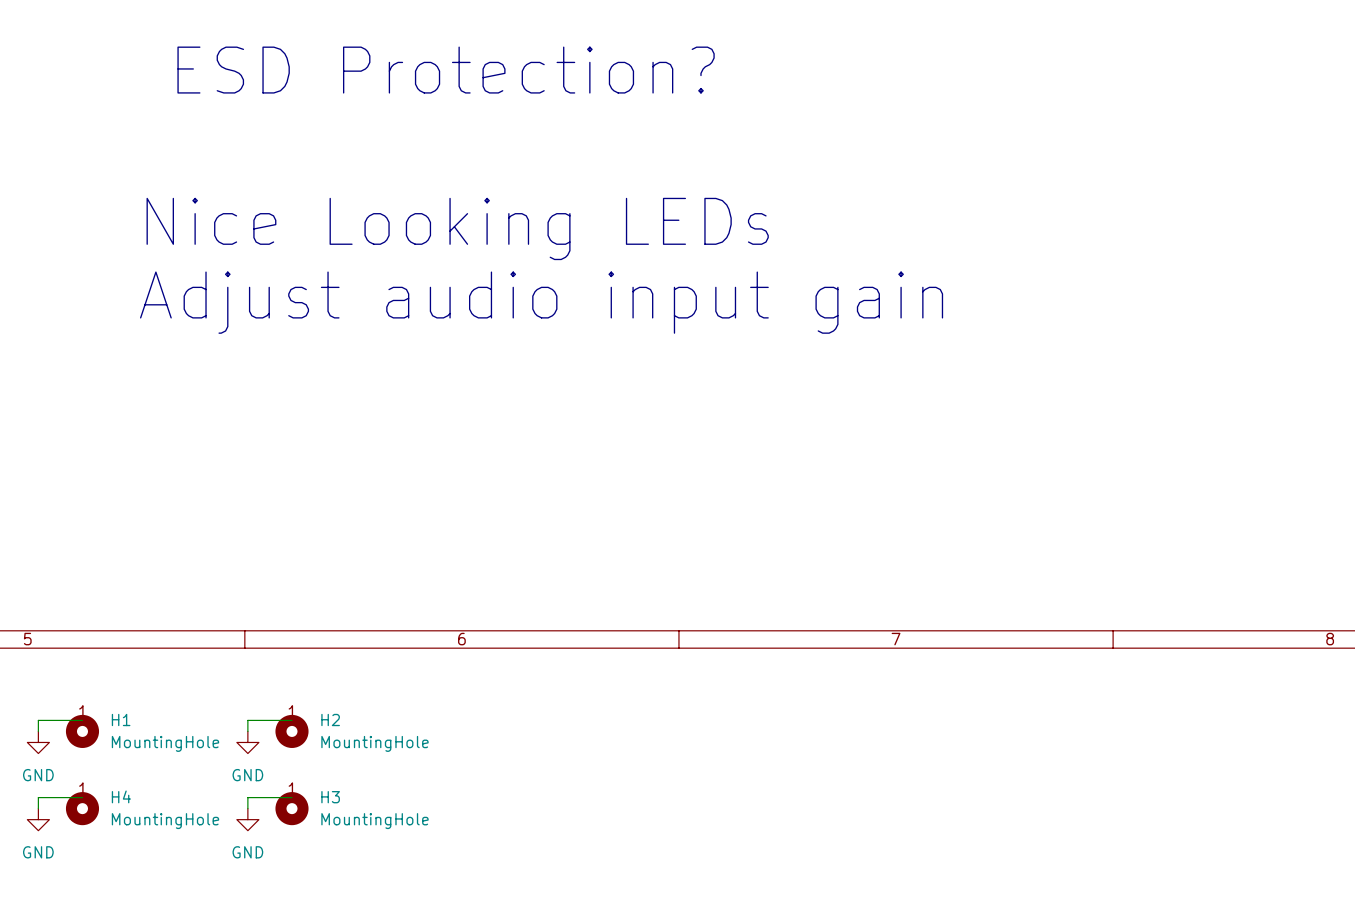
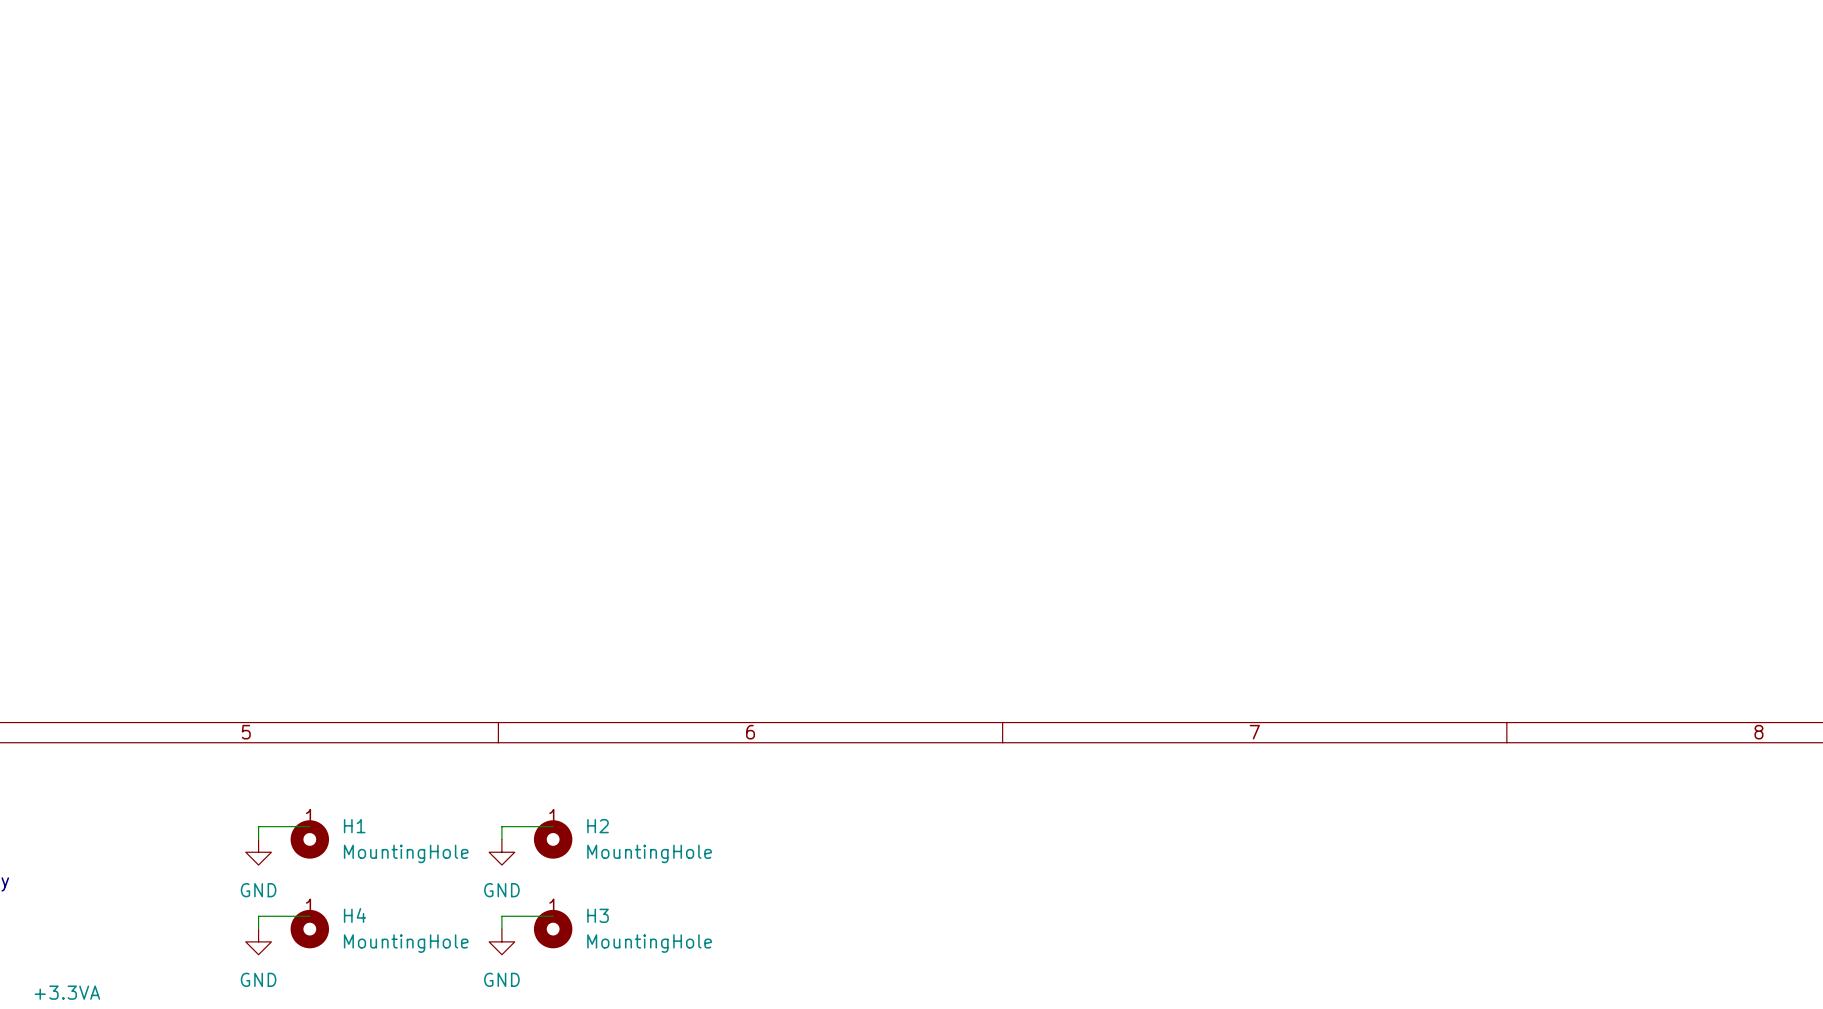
text: ESD Protection? (446, 70) -> none
text: Nice Looking LEDs (457, 228) -> none
text: Adjust audio input gain (541, 302) -> none

